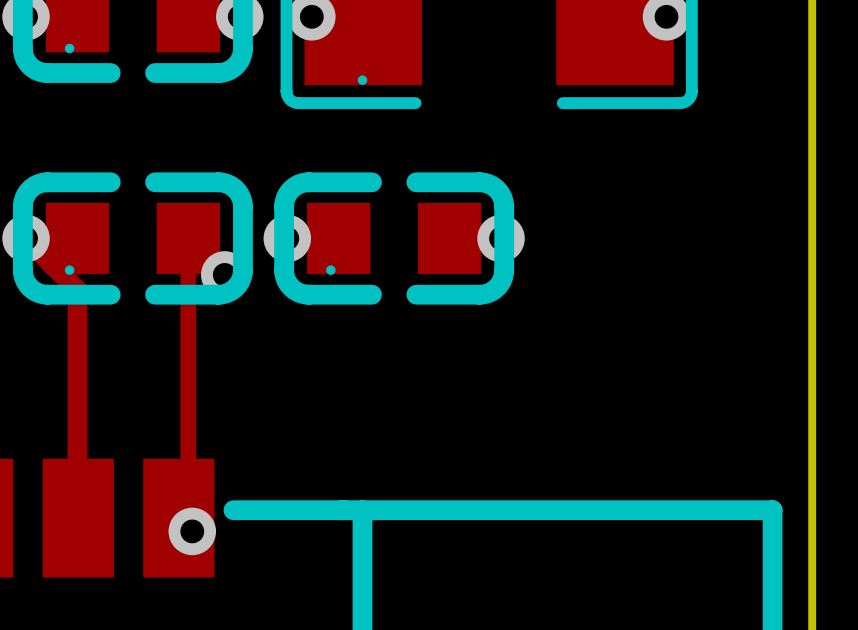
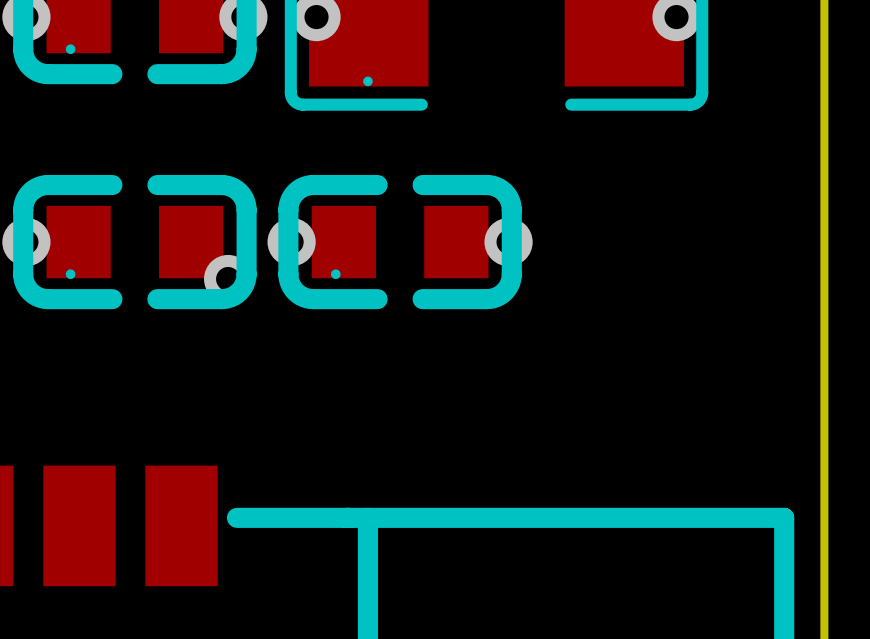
track: (26, 238) (77, 289) (77, 519) (78, 518) -> none
track: (188, 238) (188, 511) (180, 519) -> none
via: (192, 531) -> none

